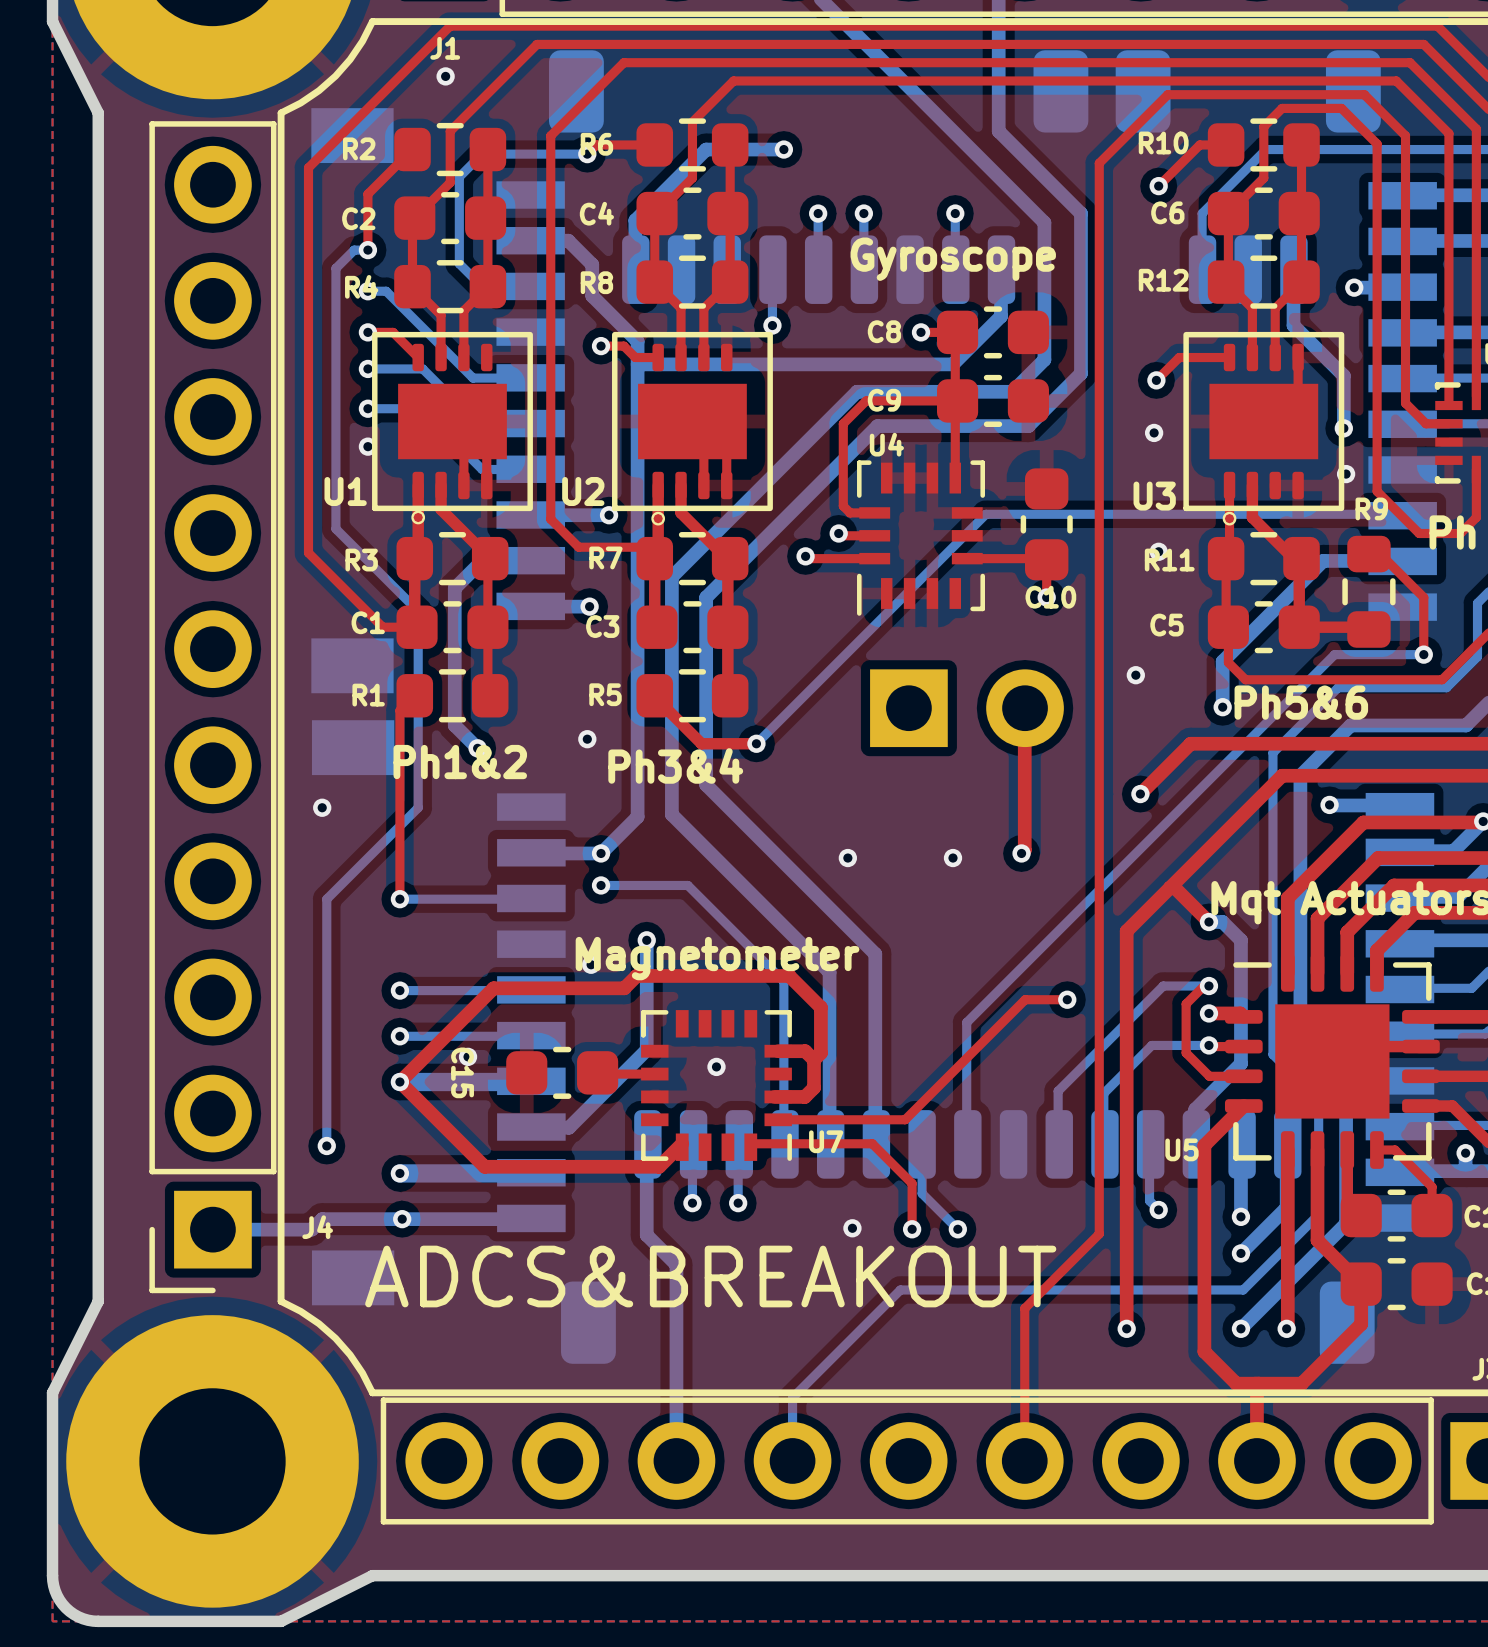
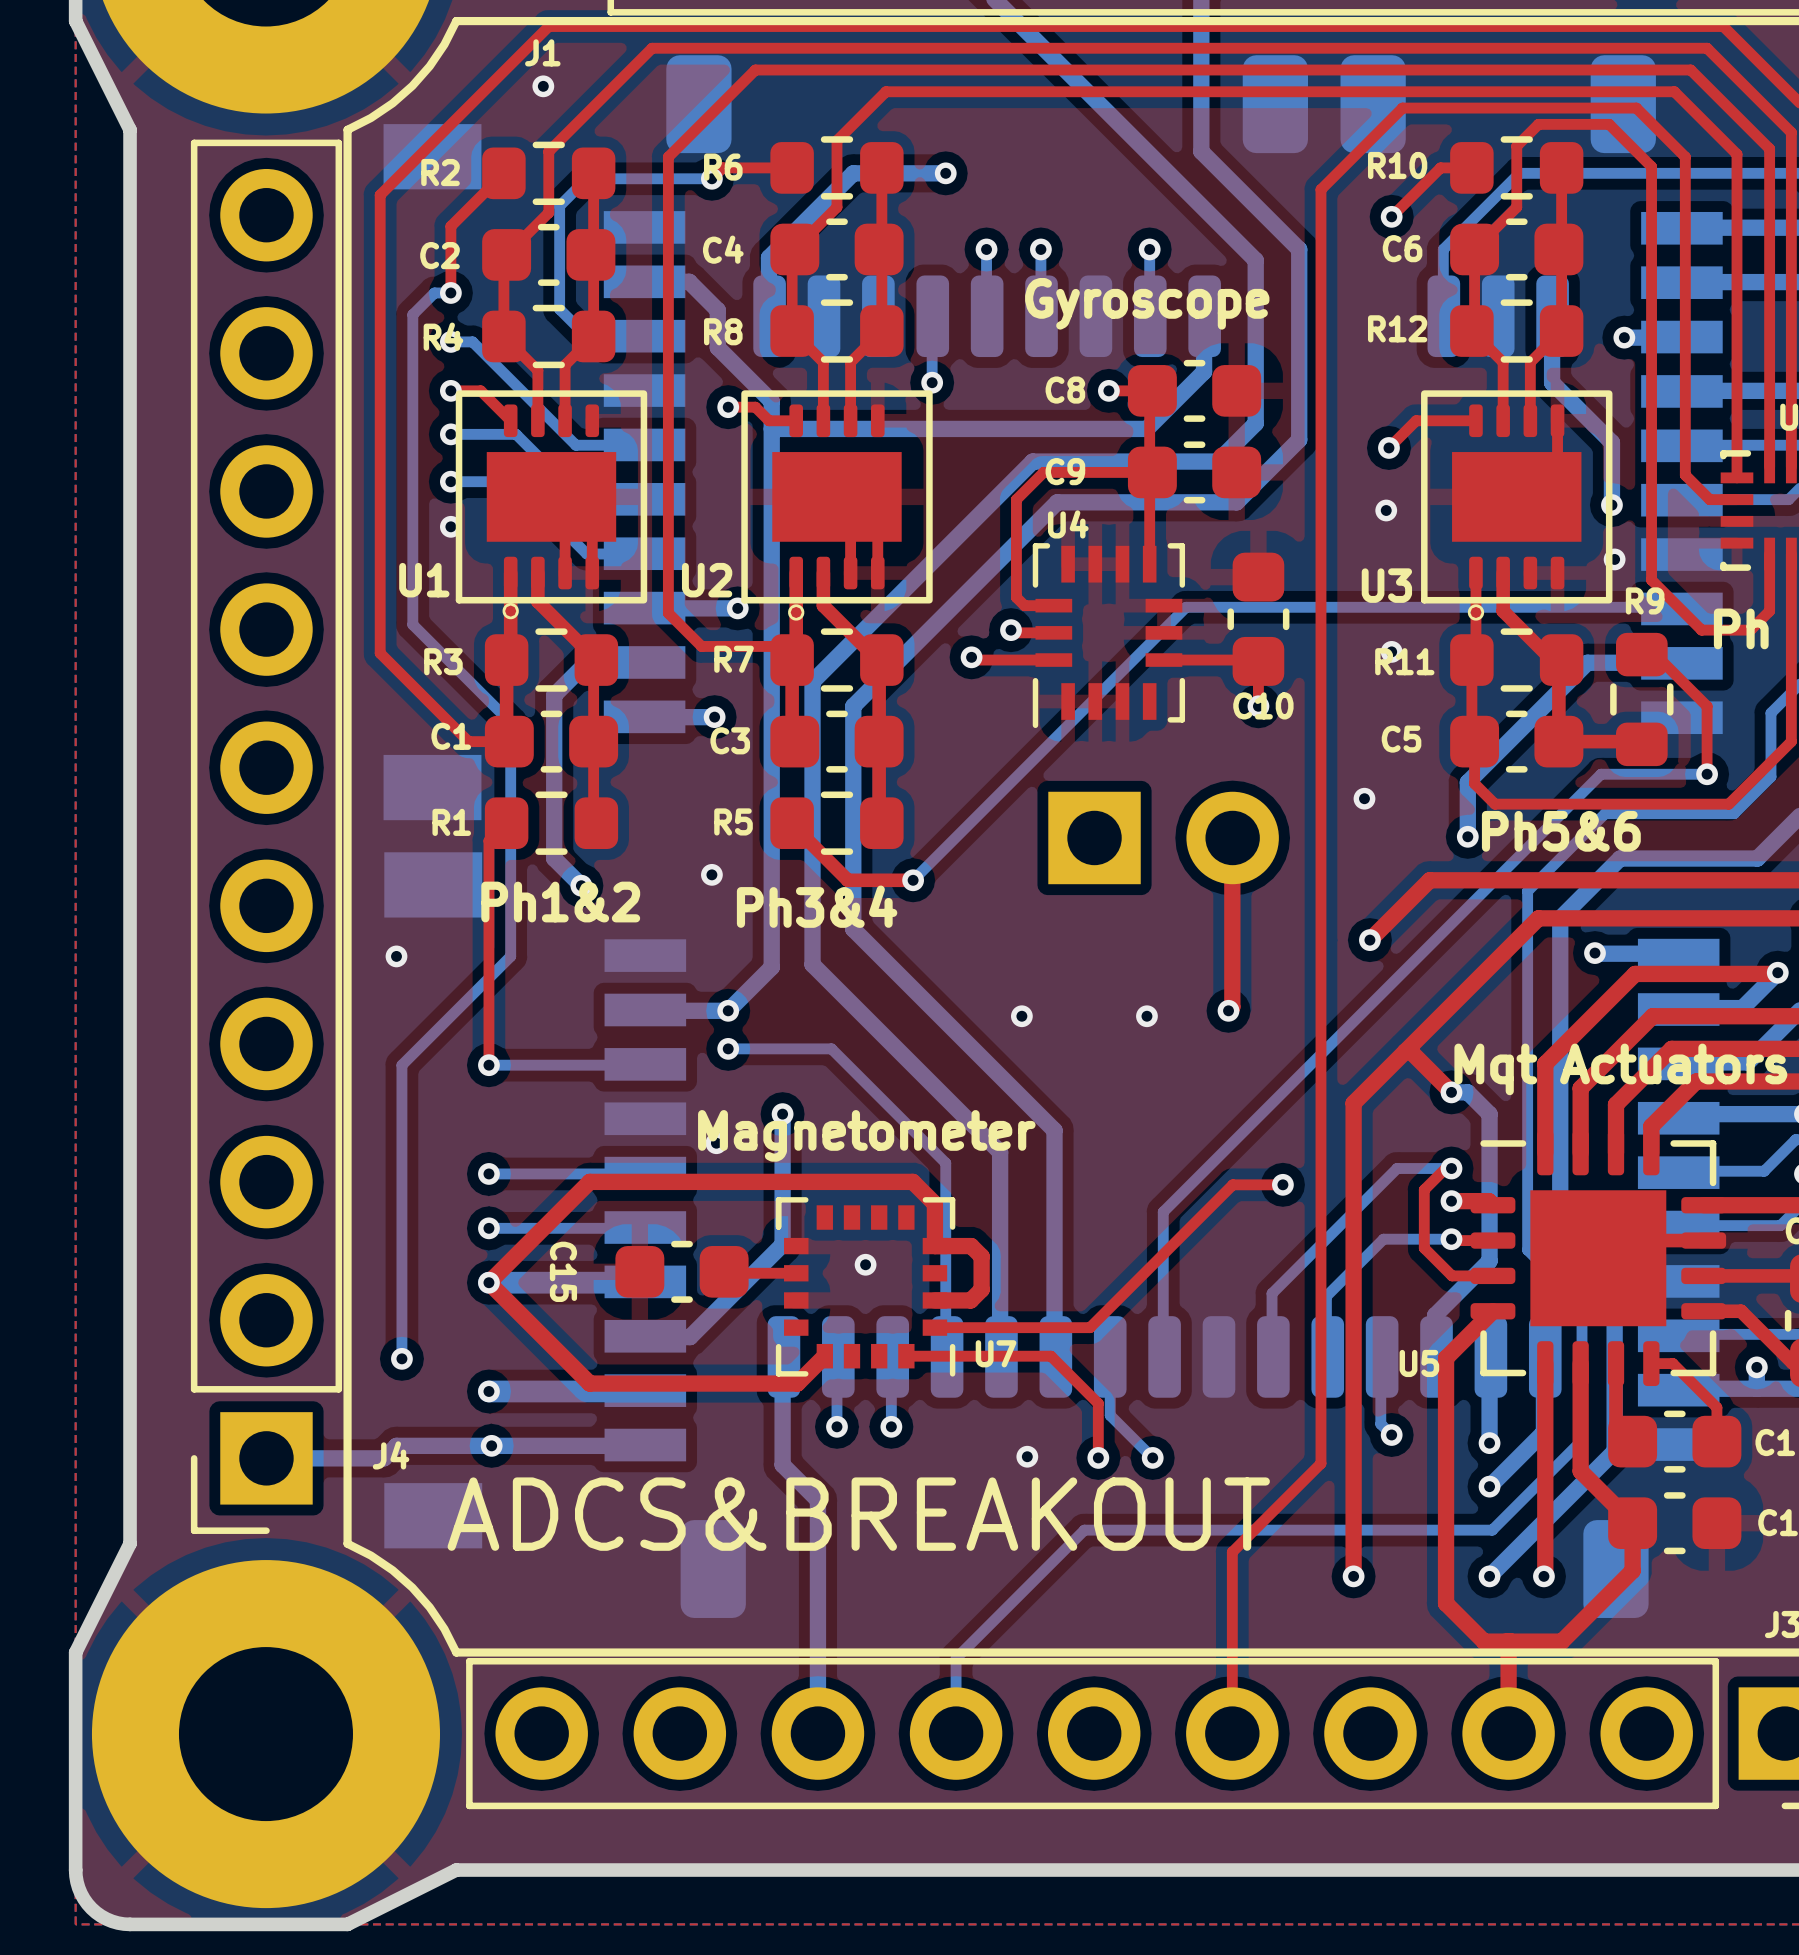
top track: (484, 997) (493, 988) (624, 988) (636, 975) (789, 975) (820, 1007) (820, 1053) (814, 1059) -> (589, 1181) (912, 1181) (934, 1203) (934, 1246) (939, 1246)
U7 footprint: [641, 1010, 792, 1161] -> [775, 1197, 956, 1377]
via: (468, 1056) -> none

